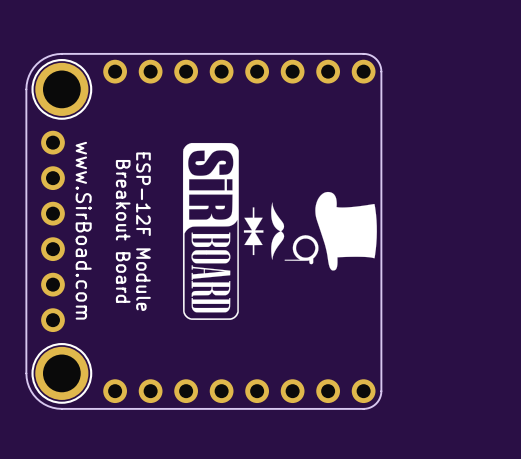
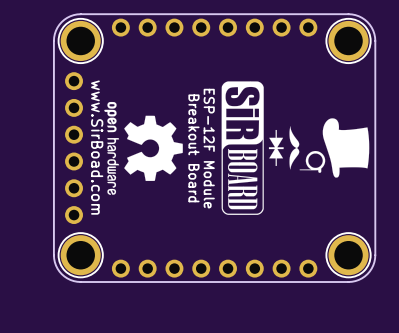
board edge: (363, 53) (376, 59) (381, 71) (381, 391) (376, 403) (363, 408) -> (308, 14) (348, 14) (358, 16) (369, 24) (375, 40) (374, 262) (367, 274) (355, 281) (308, 282)
part: none -> (348, 40)
drawing: none -> [104, 101, 183, 195]
text position: Breakout Board (123, 231) -> Breakout Board (193, 148)
text position: ESP-12F Module (143, 231) -> ESP-12F Module (209, 148)
drawing position: (210, 231) -> (242, 148)
drawing position: (310, 231) -> (319, 147)
part: none -> (348, 255)

